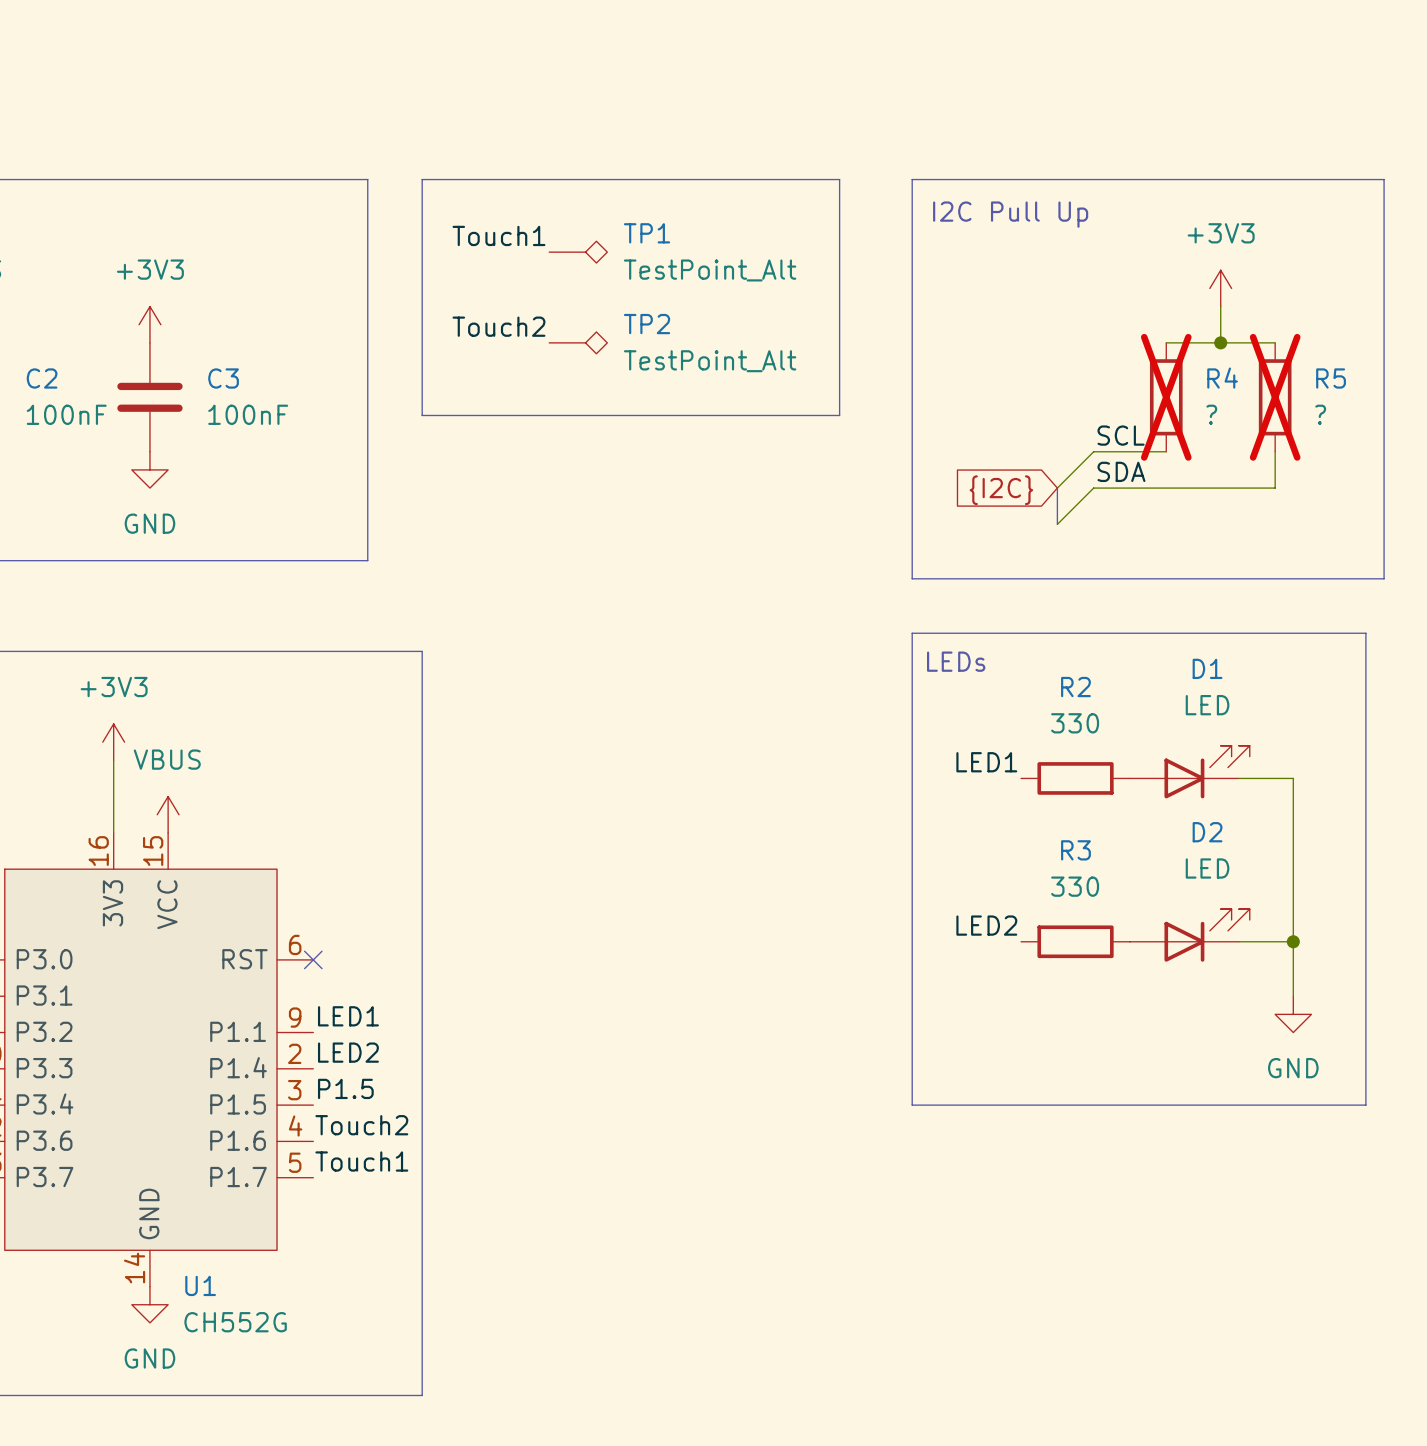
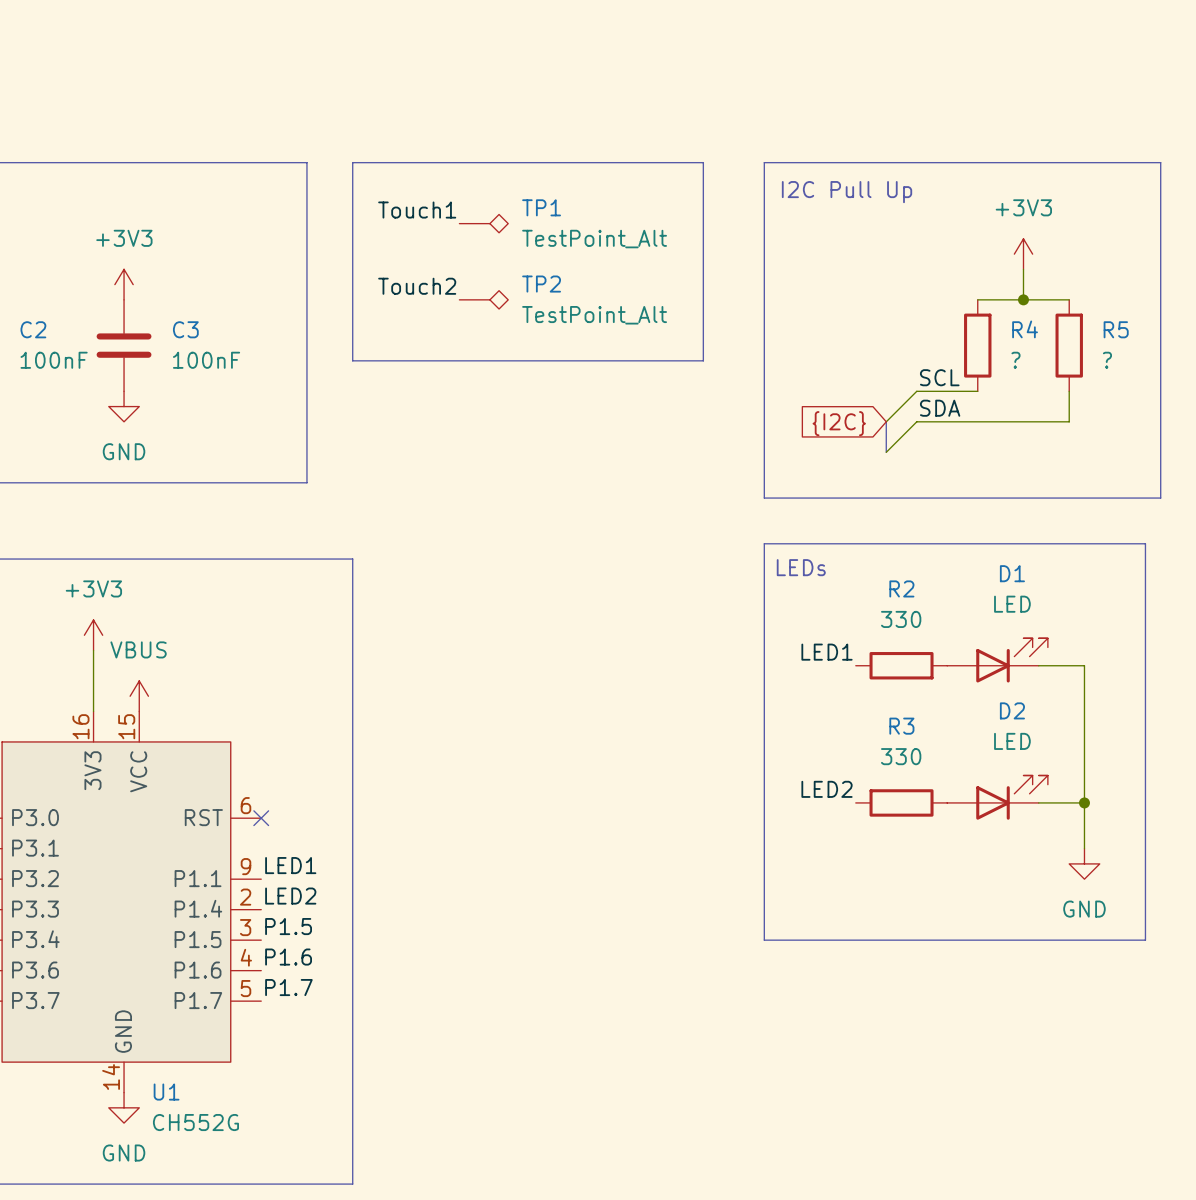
R4 do-not-place cross: (1166, 397) -> none
R5 do-not-place cross: (1275, 397) -> none
label: Touch2 (361, 1125) -> P1.6 (288, 957)
label: Touch1 (361, 1161) -> P1.7 (288, 987)

